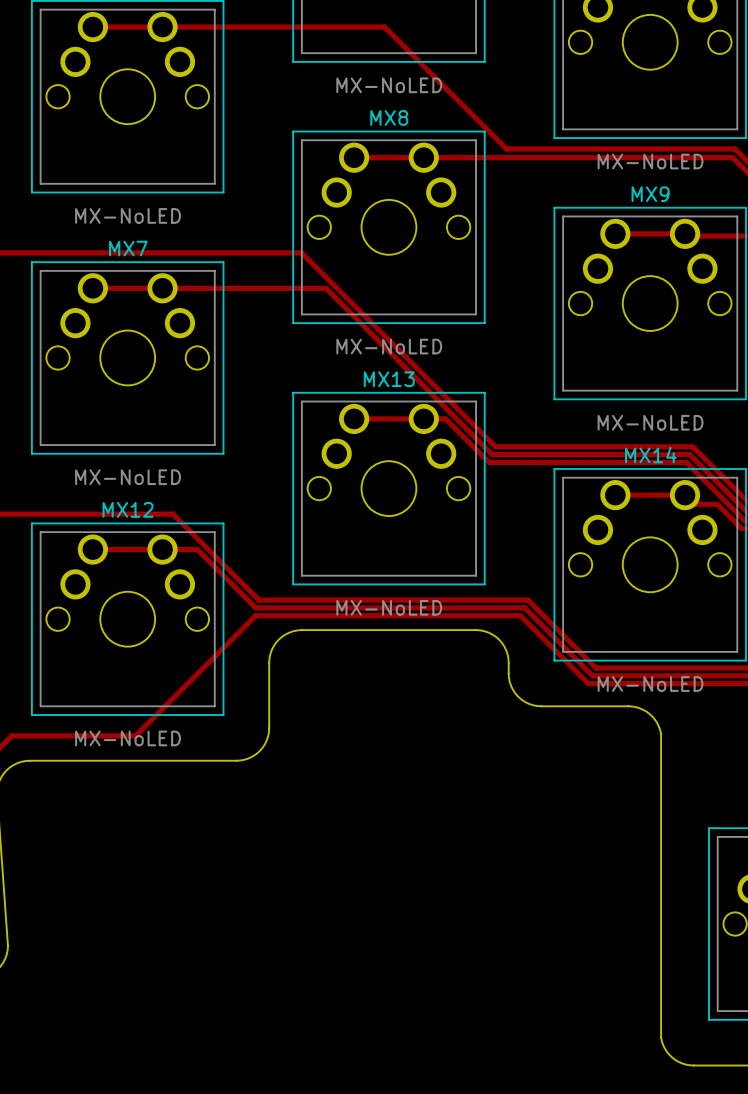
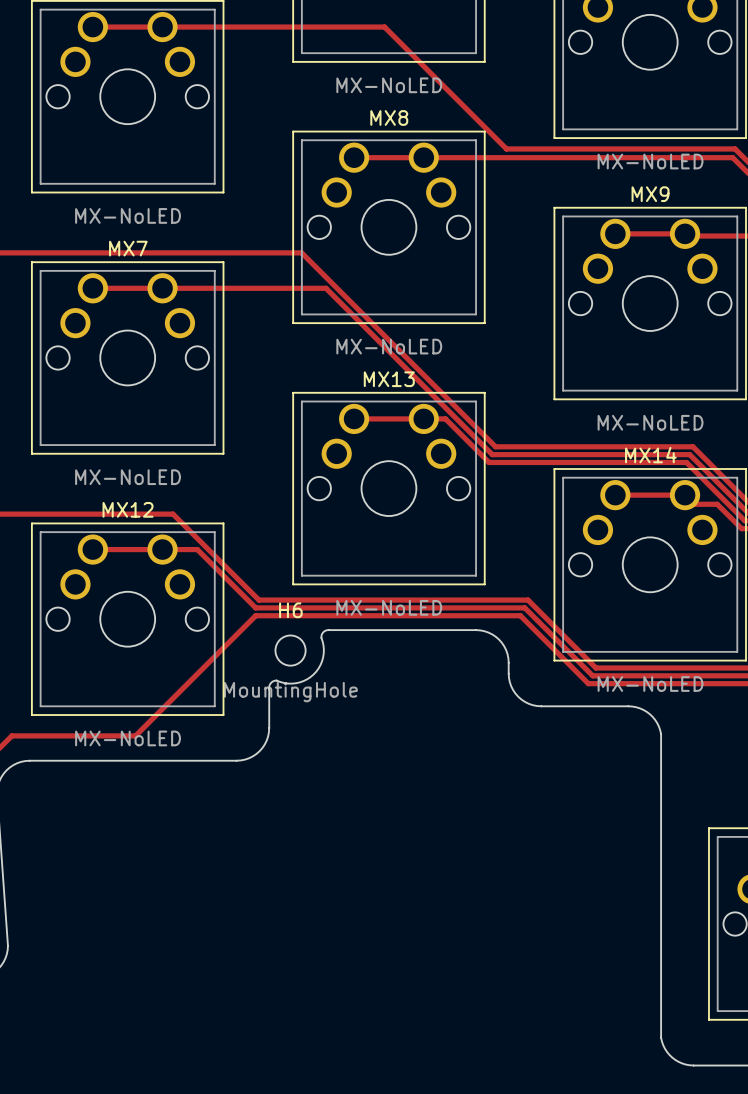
board edge: (328, 630) (297, 630) (285, 634) (278, 639) (273, 646) (269, 658) (269, 688) -> (328, 630) (321, 634) (323, 657) (313, 674) (295, 683) (273, 680) (270, 683) (269, 688)
H6: none -> MountingHole (290, 650)

